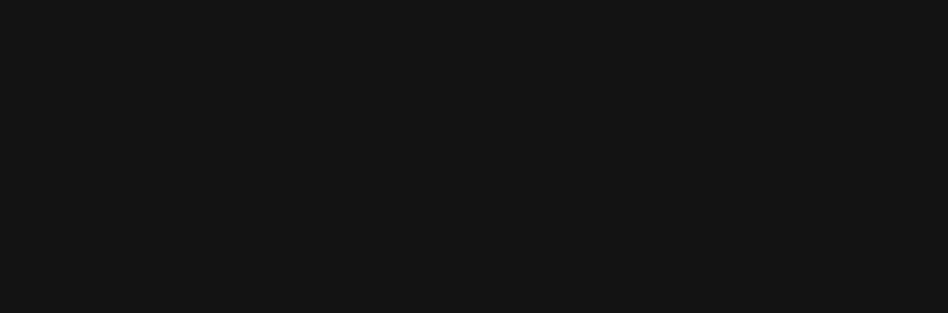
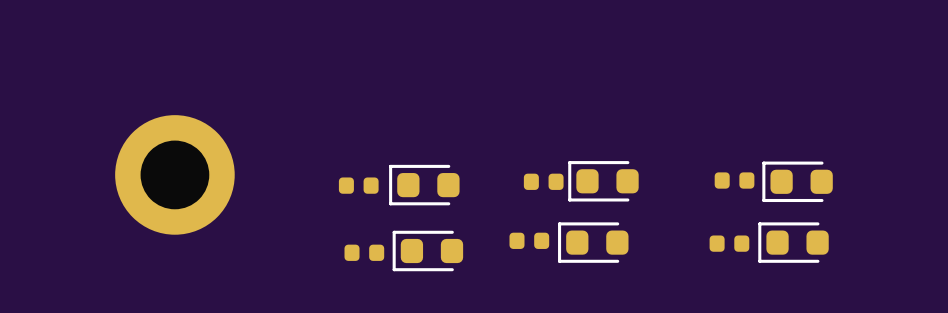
part: none -> (174, 174)
part: none -> (734, 180)
part: none -> (543, 181)
part: none -> (603, 181)
part: none -> (797, 181)
part: none -> (358, 185)
part: none -> (424, 185)
part: none -> (529, 240)
part: none -> (593, 242)
part: none -> (793, 242)
part: none -> (729, 243)
part: none -> (427, 251)
part: none -> (364, 252)

